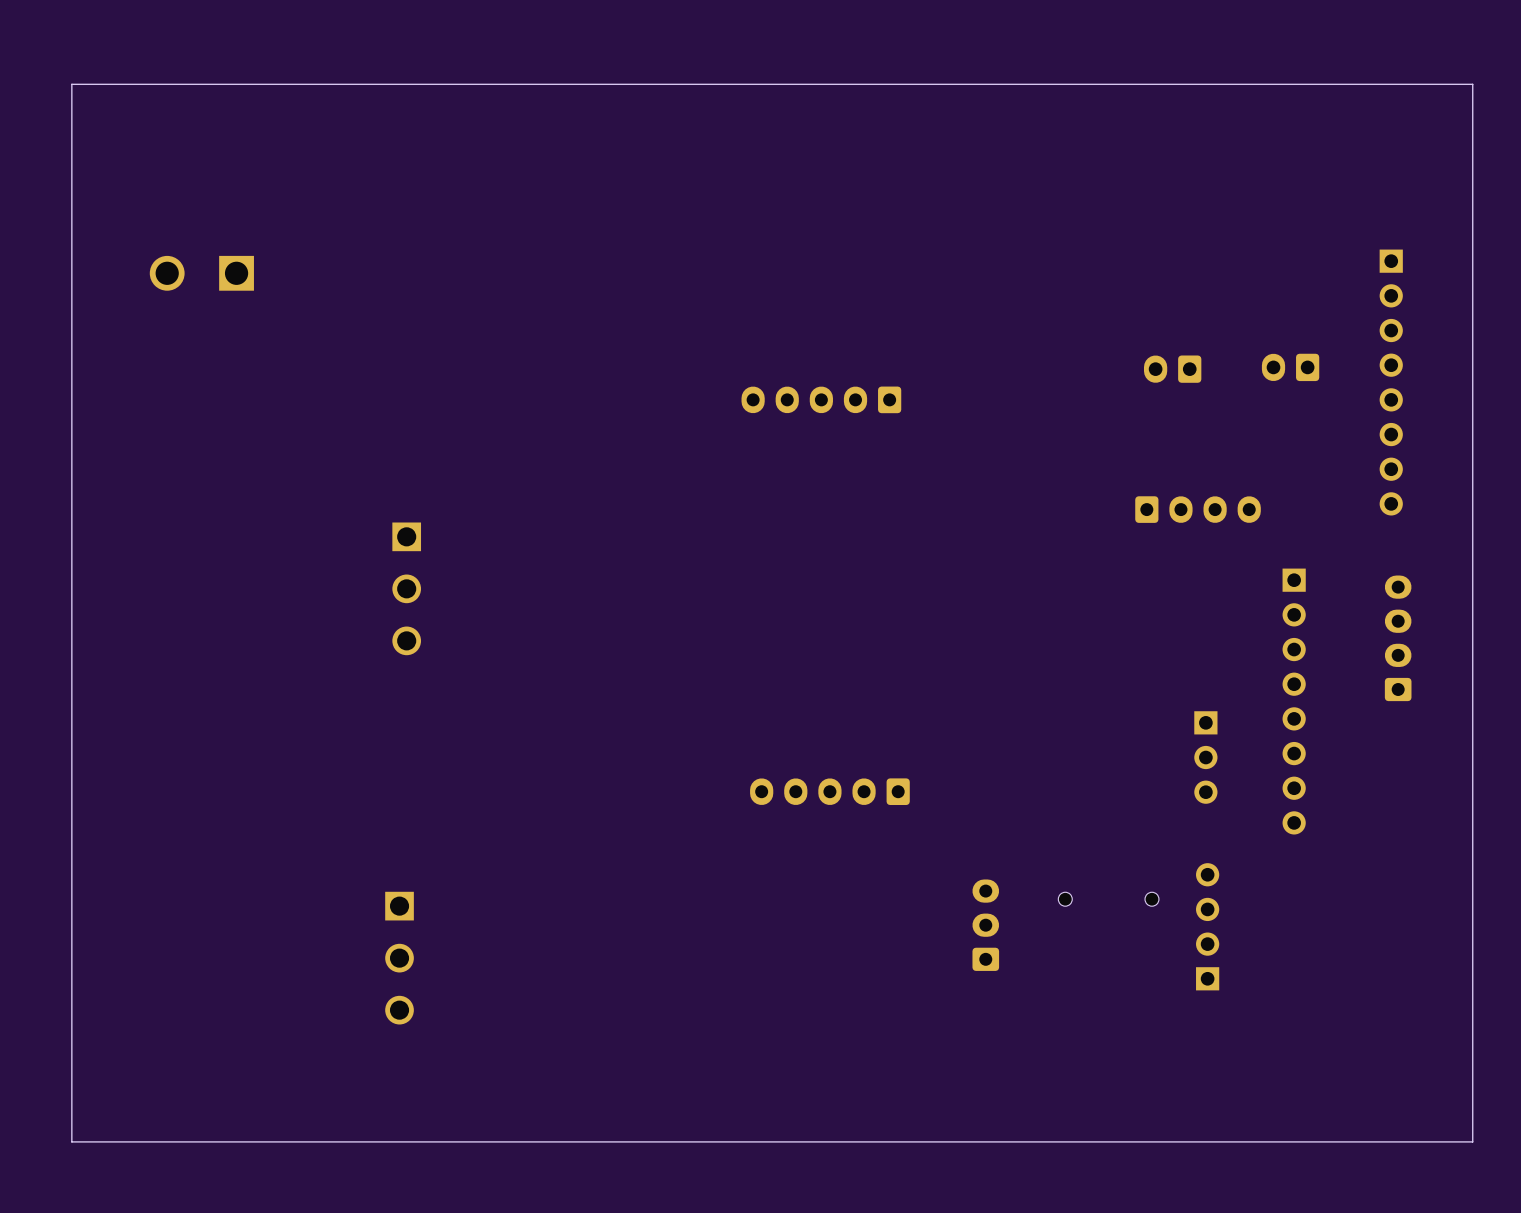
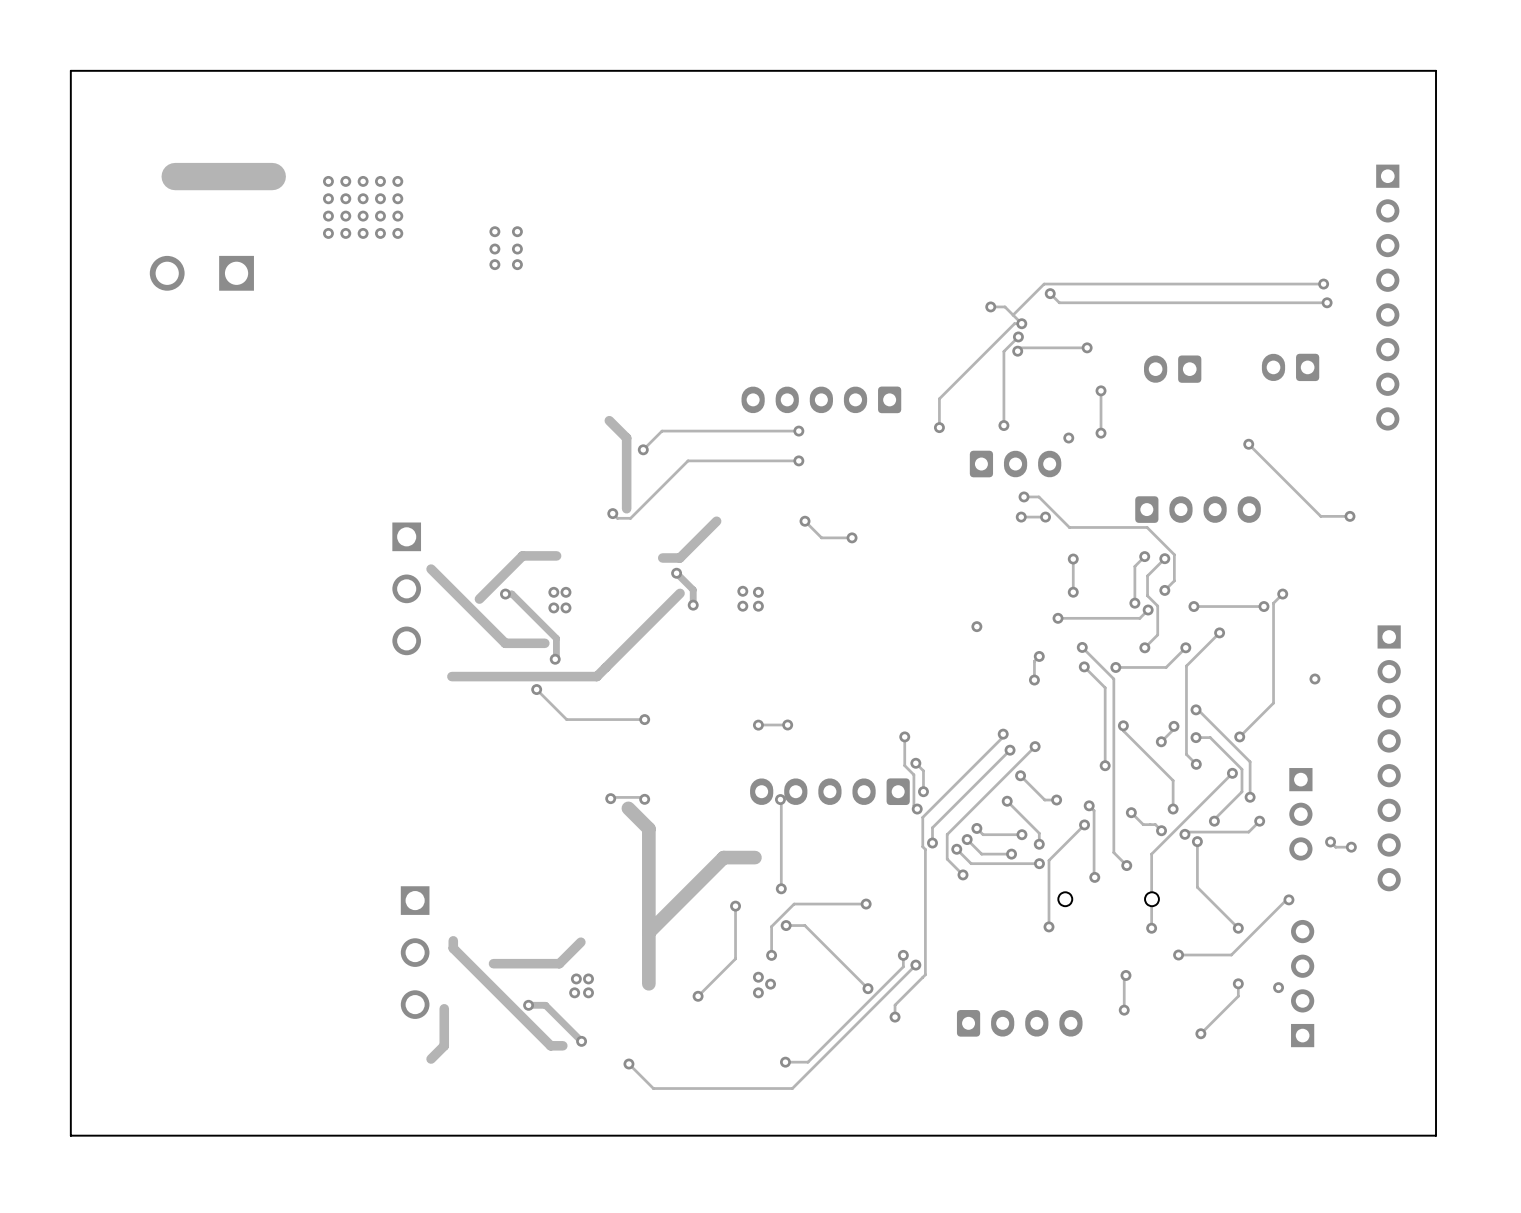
board edge: (1472, 84) (71, 84) (71, 1141) (1472, 1141) (1472, 84) -> (1436, 70) (1436, 1135) (70, 1135) (70, 70) (1436, 70)
track: none -> (272, 176) (175, 176)
via: none -> (328, 181)
via: none -> (345, 181)
via: none -> (363, 181)
via: none -> (380, 181)
via: none -> (397, 181)
via: none -> (328, 198)
via: none -> (345, 198)
via: none -> (363, 198)
via: none -> (380, 198)
via: none -> (397, 198)
via: none -> (328, 216)
via: none -> (345, 216)
via: none -> (363, 216)
via: none -> (380, 216)
via: none -> (397, 216)
via: none -> (494, 231)
via: none -> (517, 231)
via: none -> (328, 233)
via: none -> (345, 233)
via: none -> (363, 233)
via: none -> (380, 233)
via: none -> (397, 233)
via: none -> (494, 249)
via: none -> (517, 249)
via: none -> (494, 264)
via: none -> (517, 264)
track: none -> (1323, 284) (1044, 284) (1013, 315)
via: none -> (1323, 284)
track: none -> (1050, 293) (1059, 302) (1327, 302)
via: none -> (1050, 293)
via: none -> (1327, 302)
track: none -> (990, 306) (1004, 306) (1021, 323) (1014, 323) (939, 398) (939, 427)
via: none -> (990, 306)
via: none -> (1021, 323)
track: none -> (1018, 336) (1003, 351) (1003, 425)
via: none -> (1018, 336)
track: none -> (1087, 347) (1018, 347) (1014, 352)
via: none -> (1087, 347)
via: none -> (1017, 351)
part position: (1391, 382) -> (1387, 297)
track: none -> (1101, 390) (1101, 433)
via: none -> (1101, 390)
track: none -> (609, 420) (626, 438) (626, 508)
via: none -> (1003, 425)
via: none -> (939, 427)
track: none -> (798, 431) (662, 431) (643, 449)
via: none -> (798, 431)
via: none -> (1101, 433)
via: none -> (1068, 438)
track: none -> (1248, 444) (1320, 516) (1349, 516)
via: none -> (1248, 444)
via: none -> (643, 449)
track: none -> (798, 460) (688, 460) (630, 518) (617, 518) (612, 513)
via: none -> (798, 460)
part: none -> (1015, 464)
track: none -> (1024, 496) (1038, 496) (1069, 527) (1147, 527) (1174, 554) (1174, 580) (1164, 590)
via: none -> (1024, 496)
via: none -> (612, 513)
via: none -> (1349, 516)
via: none -> (1021, 517)
track: none -> (1045, 517) (1021, 517)
via: none -> (1045, 517)
track: none -> (716, 521) (679, 557) (662, 557)
track: none -> (805, 521) (821, 537) (852, 537)
via: none -> (805, 521)
via: none -> (852, 537)
track: none -> (556, 555) (522, 555) (479, 599)
track: none -> (1144, 556) (1134, 566) (1134, 603)
via: none -> (1144, 556)
track: none -> (1164, 558) (1147, 575) (1147, 595) (1157, 606) (1157, 634) (1144, 647)
via: none -> (1164, 558)
track: none -> (1073, 559) (1073, 592)
via: none -> (1073, 559)
track: none -> (431, 569) (505, 643) (544, 643)
track: none -> (676, 573) (693, 589) (693, 605)
via: none -> (676, 573)
via: none -> (1164, 590)
via: none -> (742, 591)
via: none -> (553, 592)
via: none -> (565, 592)
via: none -> (758, 592)
via: none -> (1073, 592)
track: none -> (680, 593) (596, 676) (451, 676)
track: none -> (505, 594) (511, 594) (556, 638) (555, 659)
via: none -> (505, 594)
track: none -> (1282, 594) (1273, 603) (1273, 703) (1239, 736)
via: none -> (1282, 594)
via: none -> (1134, 603)
via: none -> (693, 605)
via: none -> (742, 606)
via: none -> (758, 606)
via: none -> (1193, 606)
track: none -> (1263, 606) (1193, 606)
via: none -> (1263, 606)
via: none -> (553, 607)
via: none -> (565, 607)
track: none -> (1148, 610) (1139, 618) (1058, 618)
via: none -> (1148, 610)
via: none -> (1058, 618)
via: none -> (976, 626)
track: none -> (1219, 632) (1186, 666) (1186, 754) (1196, 764)
via: none -> (1219, 632)
part: (1398, 638) -> none
track: none -> (1082, 647) (1113, 679) (1113, 852) (1126, 865)
via: none -> (1082, 647)
via: none -> (1144, 647)
track: none -> (1185, 647) (1166, 667) (1115, 667)
via: none -> (1185, 647)
track: none -> (1039, 656) (1034, 661) (1034, 680)
via: none -> (1039, 656)
via: none -> (555, 659)
track: none -> (1084, 666) (1105, 687) (1105, 765)
via: none -> (1084, 666)
via: none -> (1115, 667)
via: none -> (1314, 679)
via: none -> (1034, 680)
track: none -> (536, 689) (566, 719) (644, 719)
via: none -> (536, 689)
part position: (1294, 701) -> (1389, 758)
track: none -> (1196, 709) (1250, 761) (1250, 797)
via: none -> (1196, 709)
via: none -> (644, 719)
track: none -> (787, 724) (758, 724)
via: none -> (787, 724)
via: none -> (758, 725)
track: none -> (1123, 725) (1123, 730) (1173, 780) (1173, 809)
via: none -> (1123, 725)
track: none -> (1173, 726) (1173, 729) (1161, 741)
via: none -> (1173, 726)
track: none -> (1003, 734) (1003, 736) (922, 817) (922, 846) (925, 849) (925, 974) (895, 1005) (895, 1017)
via: none -> (1003, 734)
track: none -> (904, 736) (904, 765) (913, 774) (913, 805) (917, 809)
via: none -> (904, 736)
via: none -> (1239, 736)
track: none -> (1196, 737) (1210, 737) (1242, 769) (1242, 791) (1214, 821)
via: none -> (1196, 737)
via: none -> (1161, 741)
track: none -> (1035, 746) (947, 834) (947, 859) (963, 874)
via: none -> (1035, 746)
track: none -> (1010, 750) (932, 827) (932, 843)
via: none -> (1010, 750)
part position: (1205, 757) -> (1300, 814)
track: none -> (915, 763) (923, 770) (923, 791)
via: none -> (915, 763)
via: none -> (1196, 764)
via: none -> (1105, 765)
track: none -> (1232, 773) (1151, 854) (1151, 928)
via: none -> (1232, 773)
track: none -> (1020, 775) (1044, 800) (1056, 800)
via: none -> (1020, 775)
via: none -> (923, 791)
via: none -> (1250, 797)
track: none -> (610, 798) (642, 797) (644, 799)
via: none -> (610, 798)
via: none -> (644, 799)
track: none -> (780, 799) (781, 888) (779, 886)
via: none -> (780, 799)
via: none -> (1056, 800)
track: none -> (1007, 801) (1039, 833) (1039, 844)
via: none -> (1007, 801)
track: none -> (1089, 805) (1094, 810) (1094, 877)
via: none -> (1089, 805)
track: none -> (628, 808) (648, 828) (648, 983)
via: none -> (917, 809)
via: none -> (1173, 809)
track: none -> (1131, 812) (1143, 824) (1155, 824) (1161, 830)
via: none -> (1131, 812)
via: none -> (1214, 821)
track: none -> (1259, 821) (1248, 832) (1187, 832) (1184, 834)
via: none -> (1259, 821)
track: none -> (1084, 824) (1048, 860) (1048, 926)
via: none -> (1084, 824)
track: none -> (976, 828) (983, 834) (1021, 834)
via: none -> (976, 828)
via: none -> (1161, 830)
via: none -> (1021, 834)
via: none -> (1184, 834)
track: none -> (967, 839) (981, 854) (1011, 854)
via: none -> (967, 839)
track: none -> (1197, 841) (1197, 887) (1238, 928)
via: none -> (1197, 841)
track: none -> (1330, 841) (1335, 847) (1351, 847)
via: none -> (1330, 841)
via: none -> (932, 843)
via: none -> (1039, 844)
via: none -> (1351, 847)
track: none -> (956, 849) (971, 863) (1039, 863)
via: none -> (956, 849)
via: none -> (1011, 854)
track: none -> (754, 857) (723, 857) (648, 932)
via: none -> (1039, 863)
via: none -> (1126, 865)
via: none -> (963, 874)
via: none -> (1094, 877)
via: none -> (781, 888)
track: none -> (1288, 899) (1286, 899) (1231, 955) (1178, 955)
via: none -> (1288, 899)
track: none -> (866, 904) (794, 904) (771, 926) (771, 955)
via: none -> (866, 904)
track: none -> (735, 906) (735, 958) (698, 996)
via: none -> (735, 906)
track: none -> (786, 925) (804, 925) (867, 988)
via: none -> (786, 925)
part: (985, 925) -> none
via: none -> (1048, 926)
part position: (1207, 926) -> (1302, 983)
via: none -> (1151, 928)
via: none -> (1238, 928)
track: none -> (453, 940) (453, 948) (550, 1045) (562, 1045)
track: none -> (580, 942) (559, 963) (493, 963)
via: none -> (771, 955)
track: none -> (903, 955) (903, 966) (807, 1062) (785, 1062)
via: none -> (903, 955)
via: none -> (1178, 955)
part position: (399, 958) -> (415, 952)
track: none -> (915, 965) (792, 1088) (653, 1088) (628, 1064)
via: none -> (915, 965)
track: none -> (1125, 975) (1124, 977) (1124, 1010)
via: none -> (1125, 975)
via: none -> (758, 977)
via: none -> (576, 978)
via: none -> (588, 978)
track: none -> (1238, 983) (1238, 996) (1200, 1033)
via: none -> (1238, 983)
via: none -> (770, 984)
via: none -> (1278, 987)
via: none -> (867, 988)
via: none -> (574, 992)
via: none -> (588, 992)
via: none -> (758, 992)
via: none -> (698, 996)
track: none -> (528, 1005) (545, 1005) (581, 1041)
via: none -> (528, 1005)
track: none -> (444, 1008) (444, 1045) (431, 1059)
via: none -> (1124, 1010)
via: none -> (895, 1017)
part: none -> (1019, 1023)
via: none -> (1200, 1033)
via: none -> (581, 1041)
via: none -> (785, 1062)
via: none -> (628, 1064)

